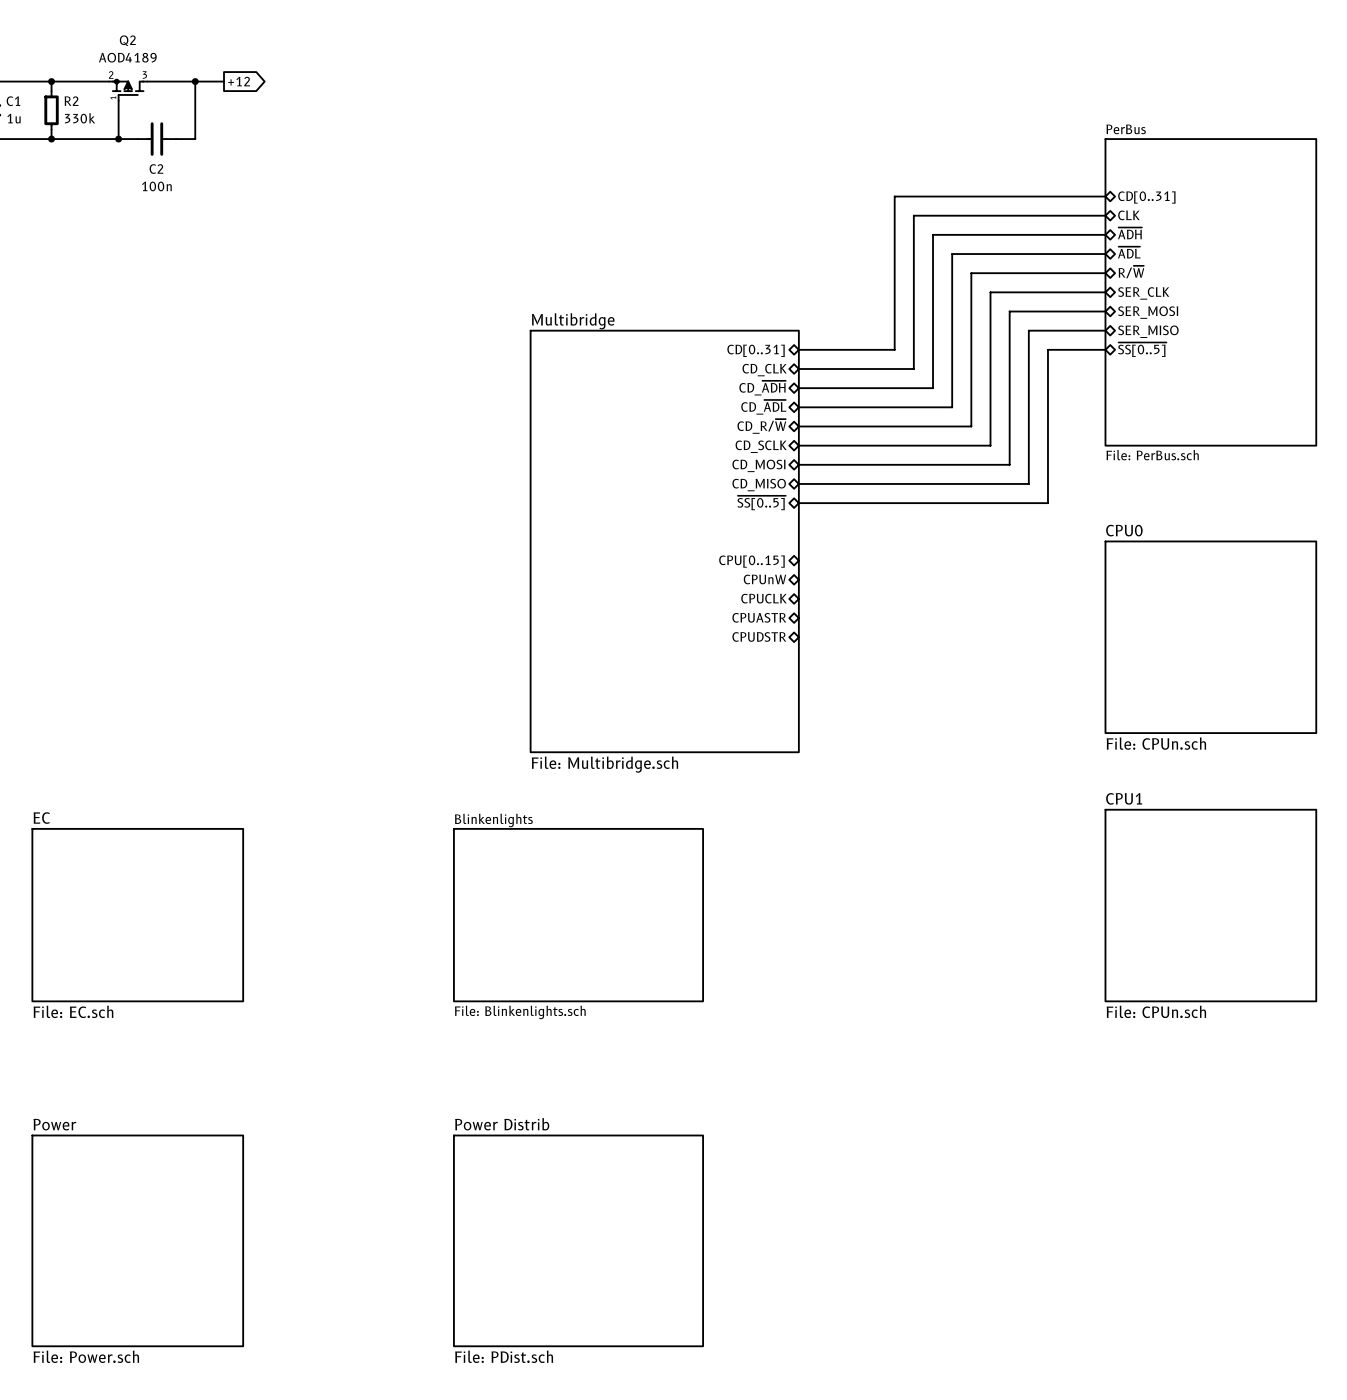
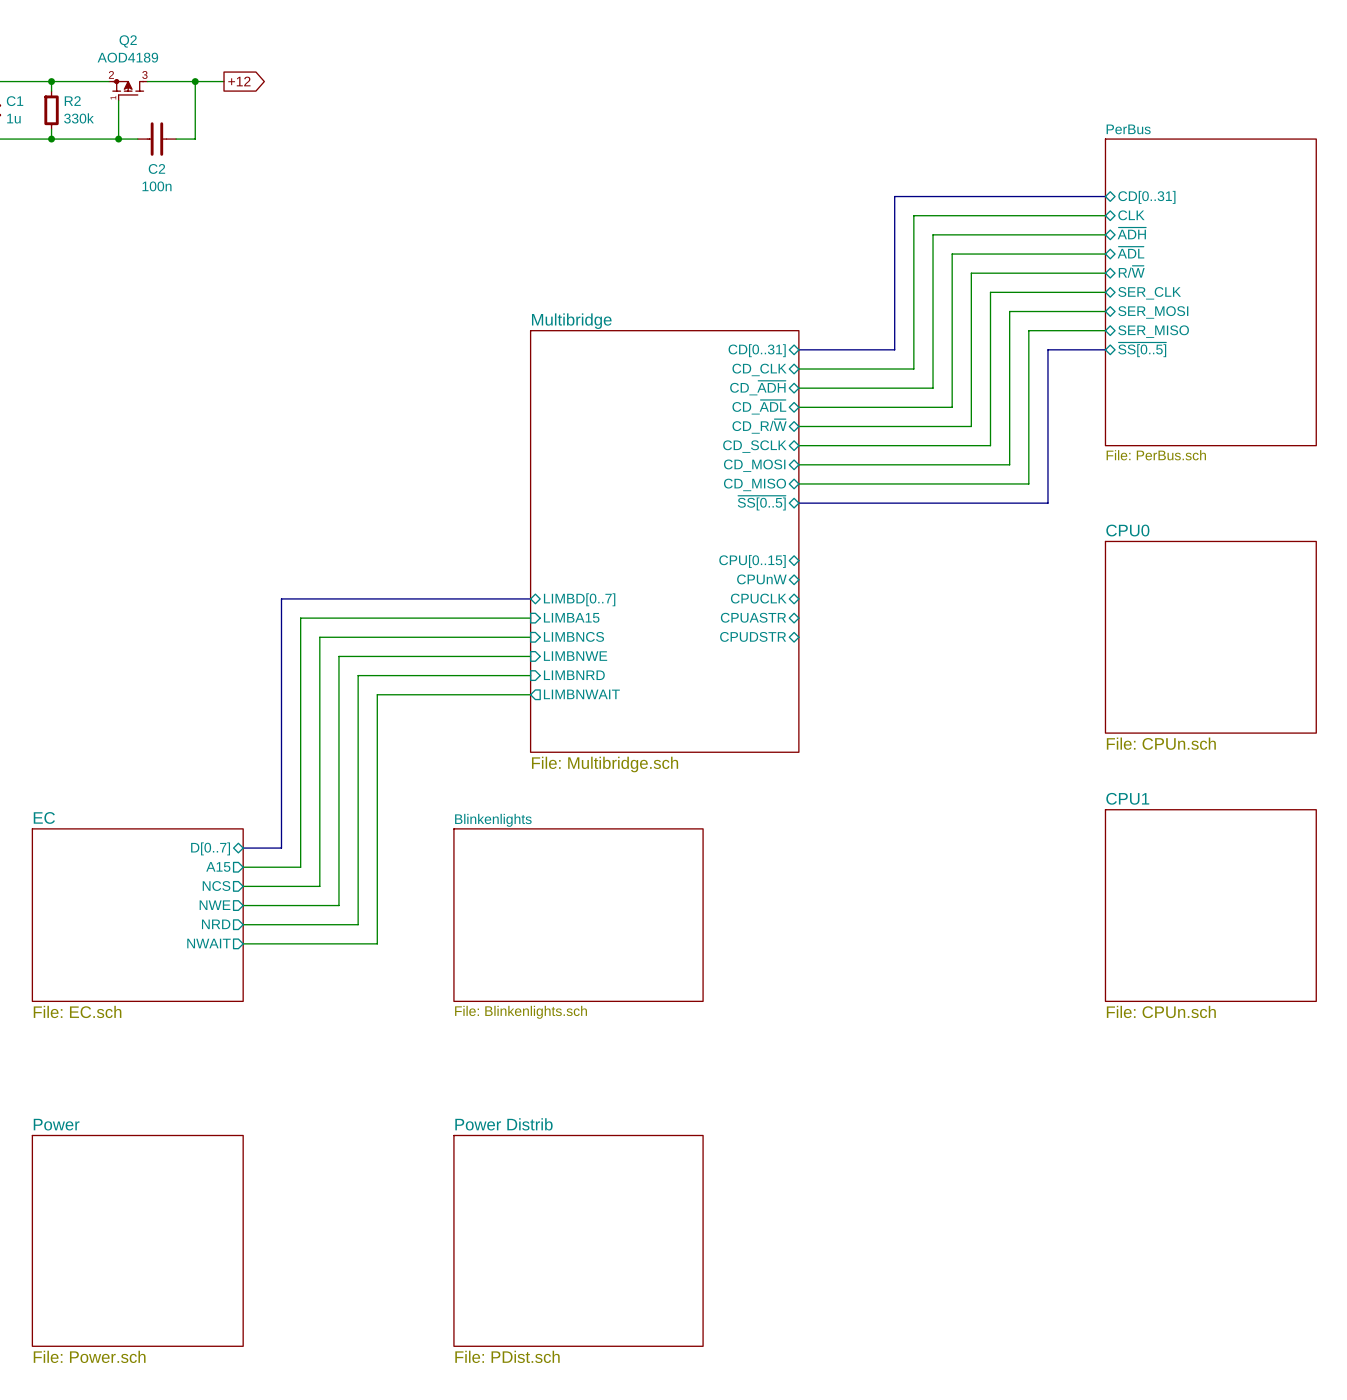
bus: none -> (530, 598) (281, 598) (281, 848) (243, 848)
sheet pin: none -> LIMBD[0..7] (579, 599)
sheet pin: none -> LIMBA15 (571, 617)
wire: none -> (530, 618) (300, 618) (300, 867) (243, 867)
sheet pin: none -> LIMBNCS (573, 636)
wire: none -> (530, 637) (319, 637) (319, 886) (243, 886)
wire: none -> (530, 656) (338, 656) (338, 905) (243, 905)
sheet pin: none -> LIMBNWE (575, 656)
wire: none -> (530, 675) (358, 675) (358, 924) (243, 924)
sheet pin: none -> LIMBNRD (574, 675)
wire: none -> (530, 694) (377, 694) (377, 943) (243, 943)
sheet pin: none -> LIMBNWAIT (581, 694)
sheet pin: none -> D[0..7] (210, 848)
sheet pin: none -> A15 (218, 866)
sheet pin: none -> NCS (216, 886)
sheet pin: none -> NWE (215, 905)
sheet pin: none -> NRD (216, 924)
sheet pin: none -> NWAIT (208, 943)

